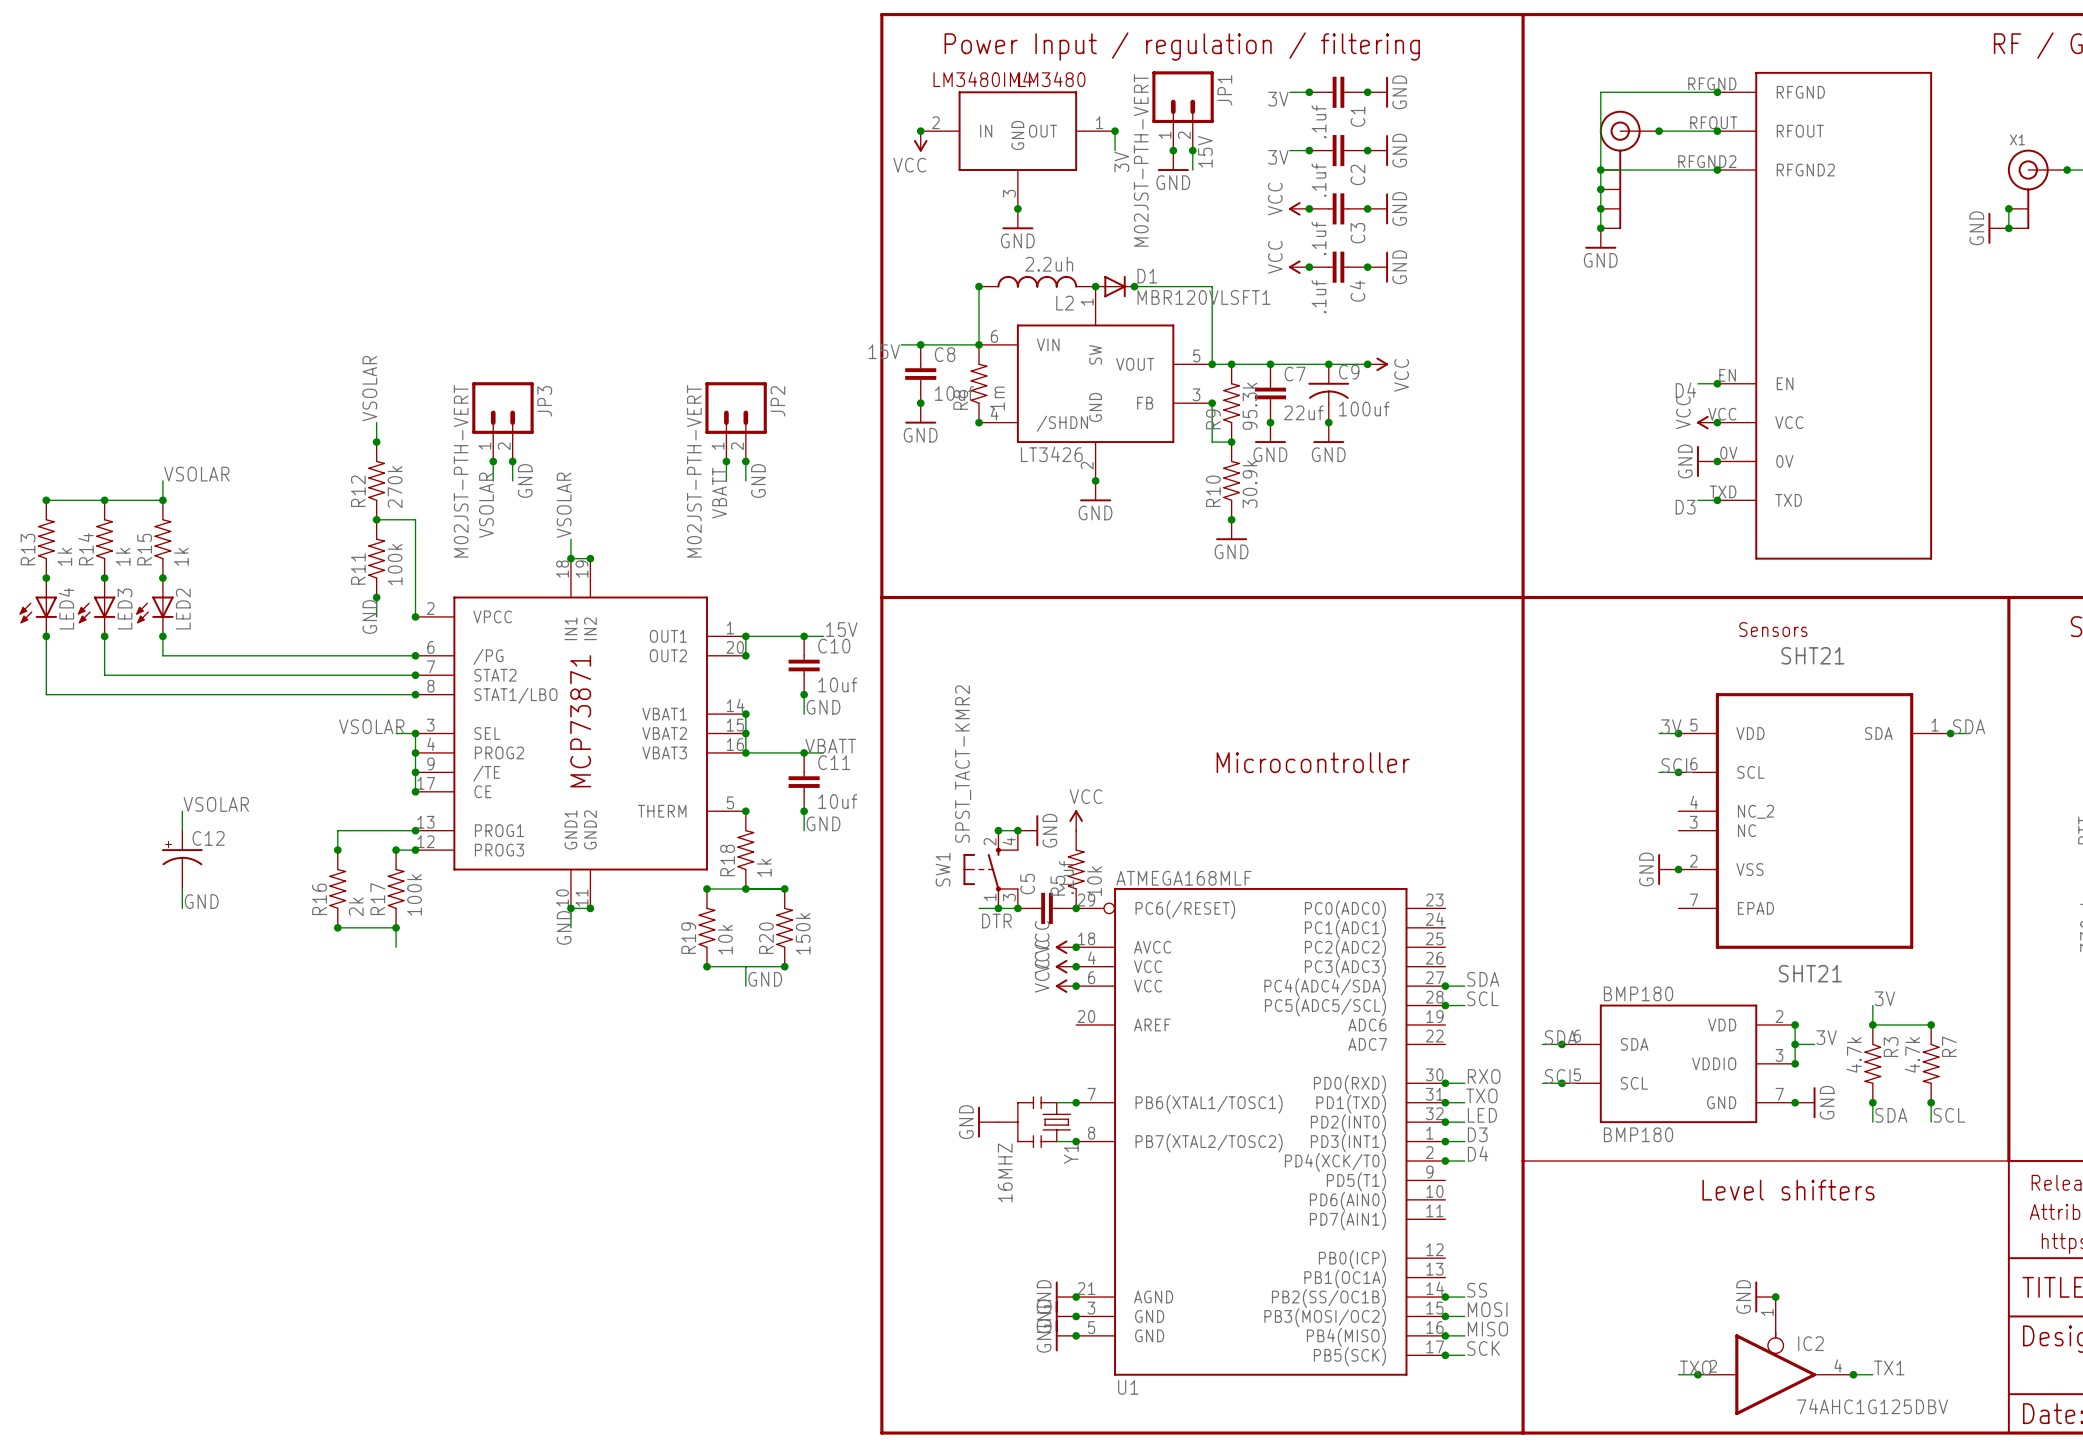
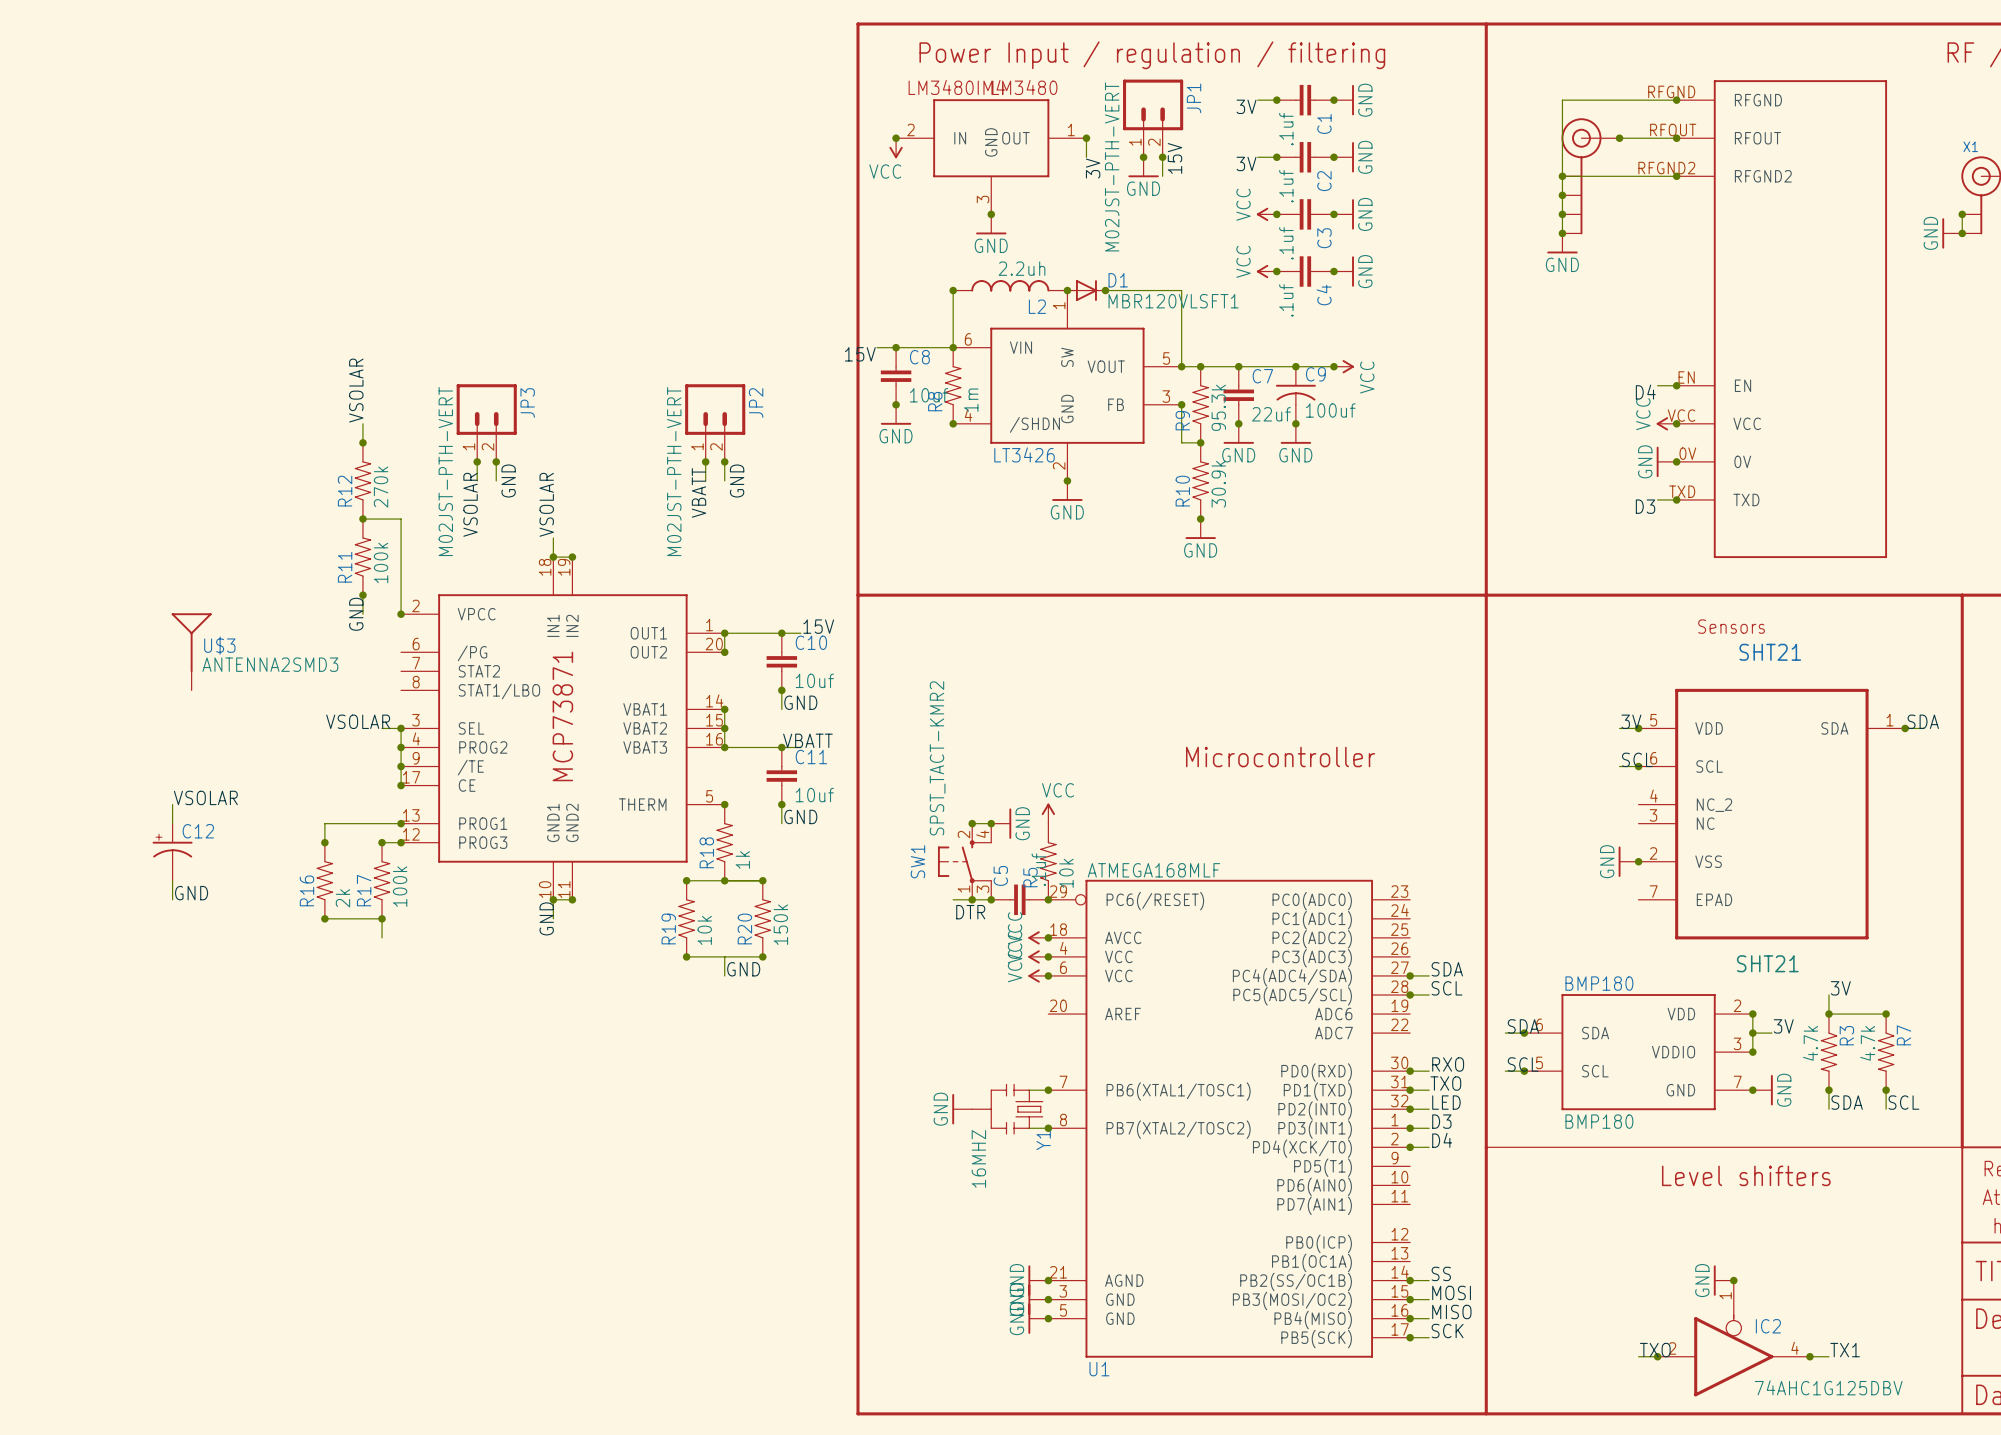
label: VSOLAR (196, 474) -> none
wire: (162, 480) (162, 500) (46, 500) -> none
junction: (46, 500) -> none
junction: (104, 500) -> none
junction: (162, 500) -> none
R13: 1k (46, 539) -> none
R14: 1k (104, 539) -> none
R15: 1k (162, 539) -> none
junction: (46, 578) -> none
junction: (104, 578) -> none
junction: (162, 578) -> none
LED4: (38, 607) -> none
LED3: (96, 607) -> none
LED2: (154, 607) -> none
wire: (46, 636) (46, 694) (415, 694) -> none
junction: (46, 636) -> none
wire: (104, 636) (104, 675) (415, 675) -> none
junction: (104, 636) -> none
wire: (162, 636) (162, 655) (415, 655) -> none
junction: (162, 636) -> none
U$3: none -> ANTENNA2SMD3 (191, 651)
junction: (415, 655) -> none
junction: (415, 675) -> none
junction: (415, 694) -> none

